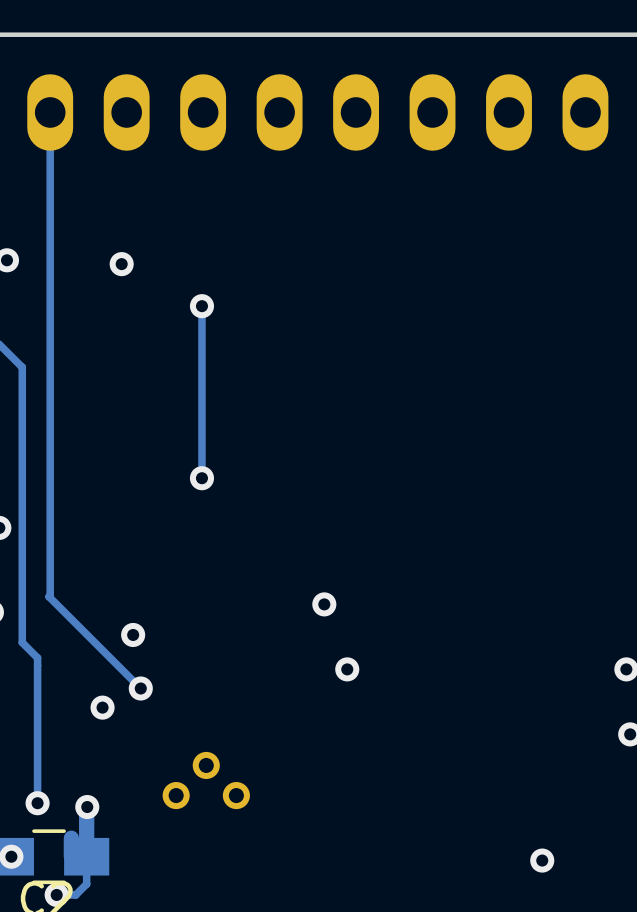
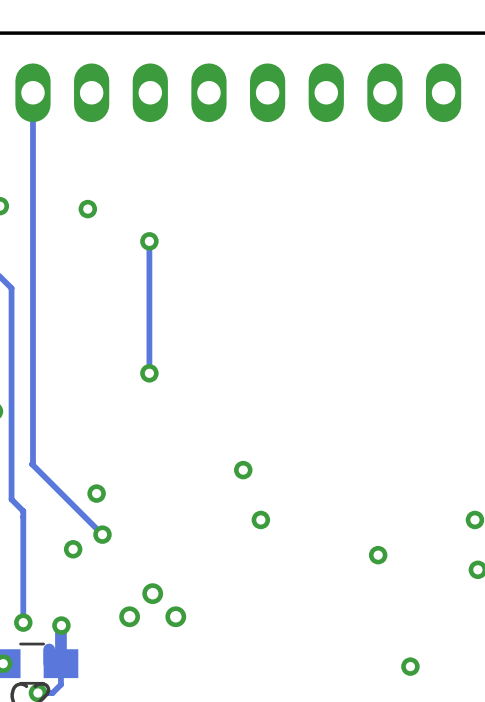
via: none -> (378, 555)

